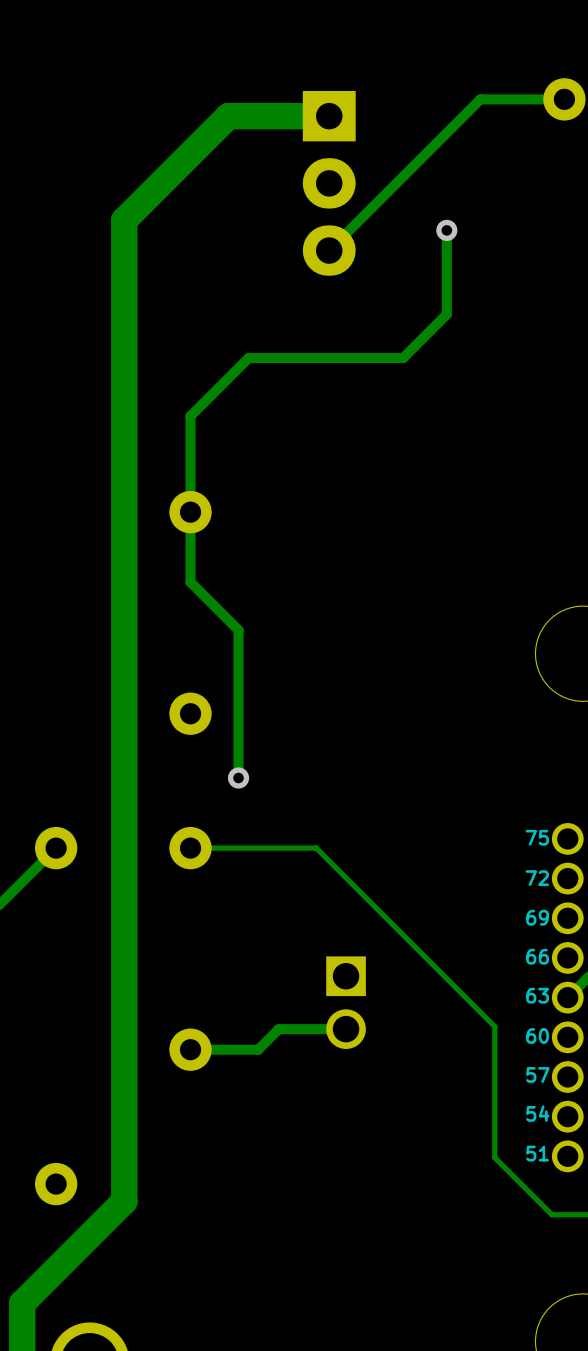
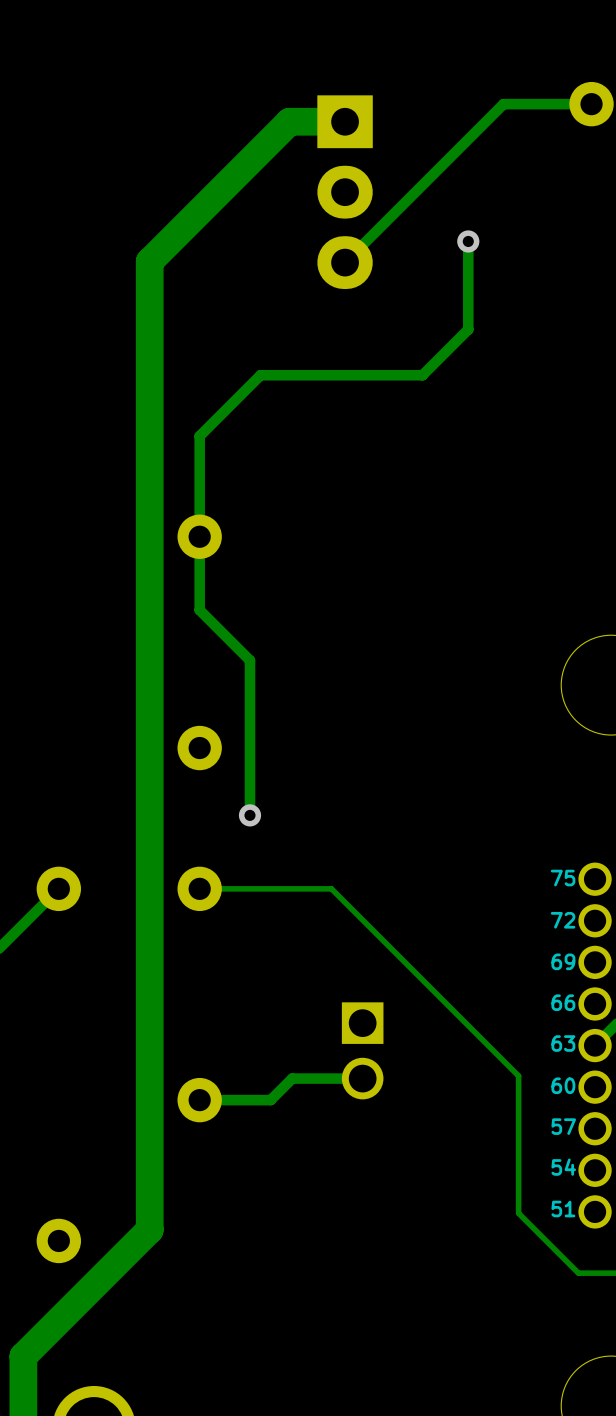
track: (276, 116) (228, 116) (124, 220) (124, 1201) (22, 1303) -> (289, 121) (149, 261) (149, 1229) (23, 1356) (23, 1365)

